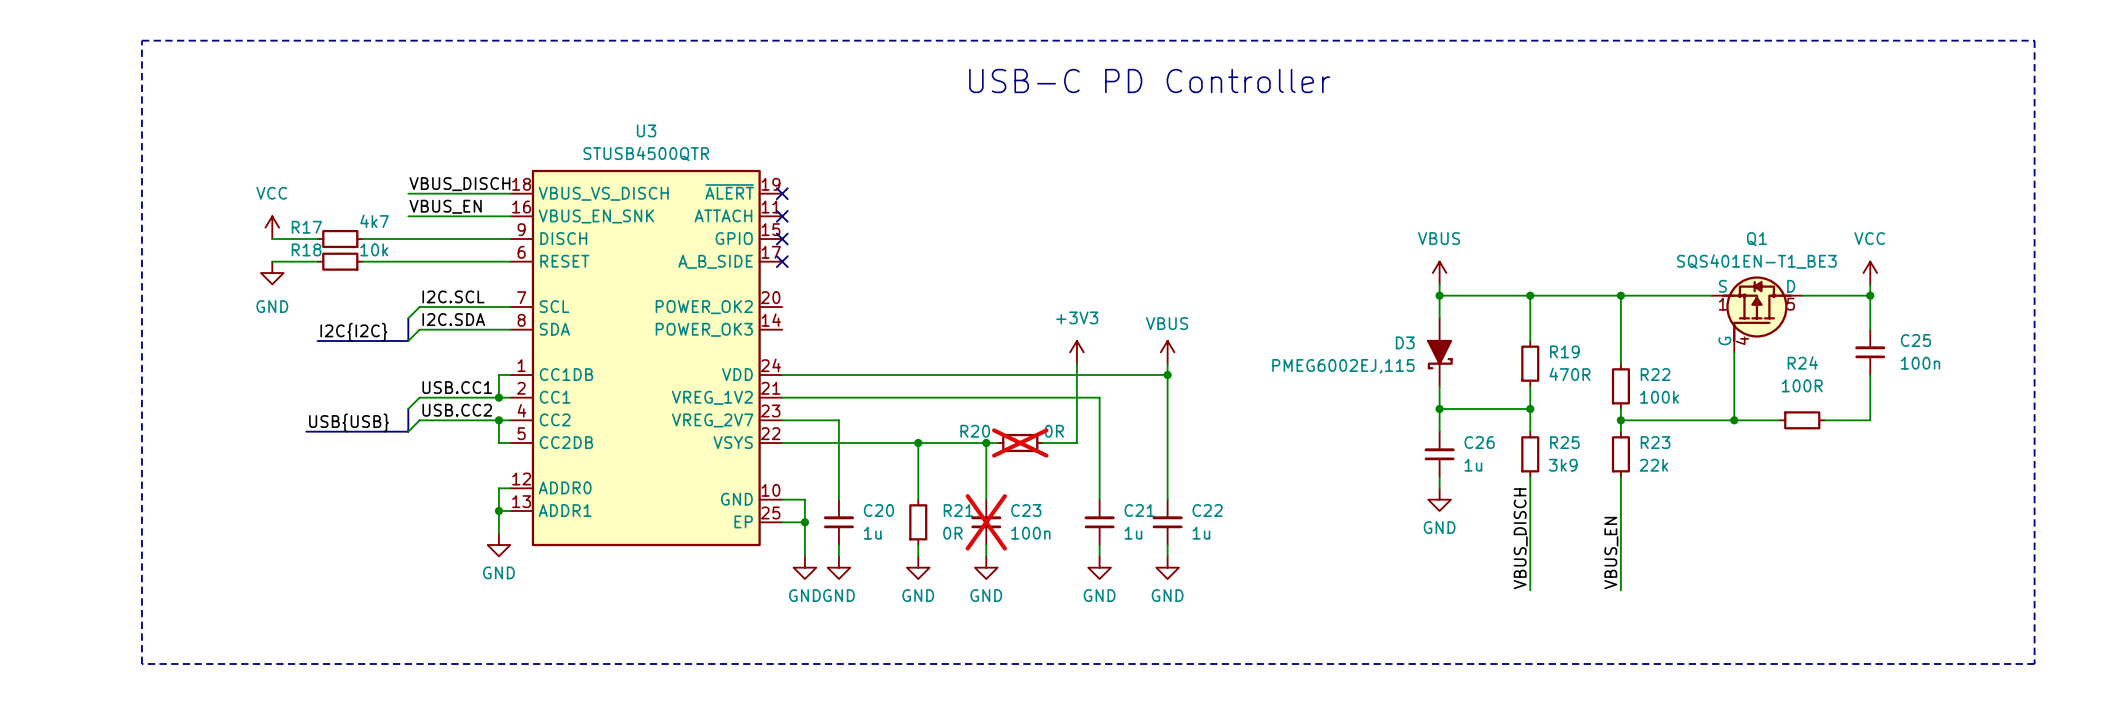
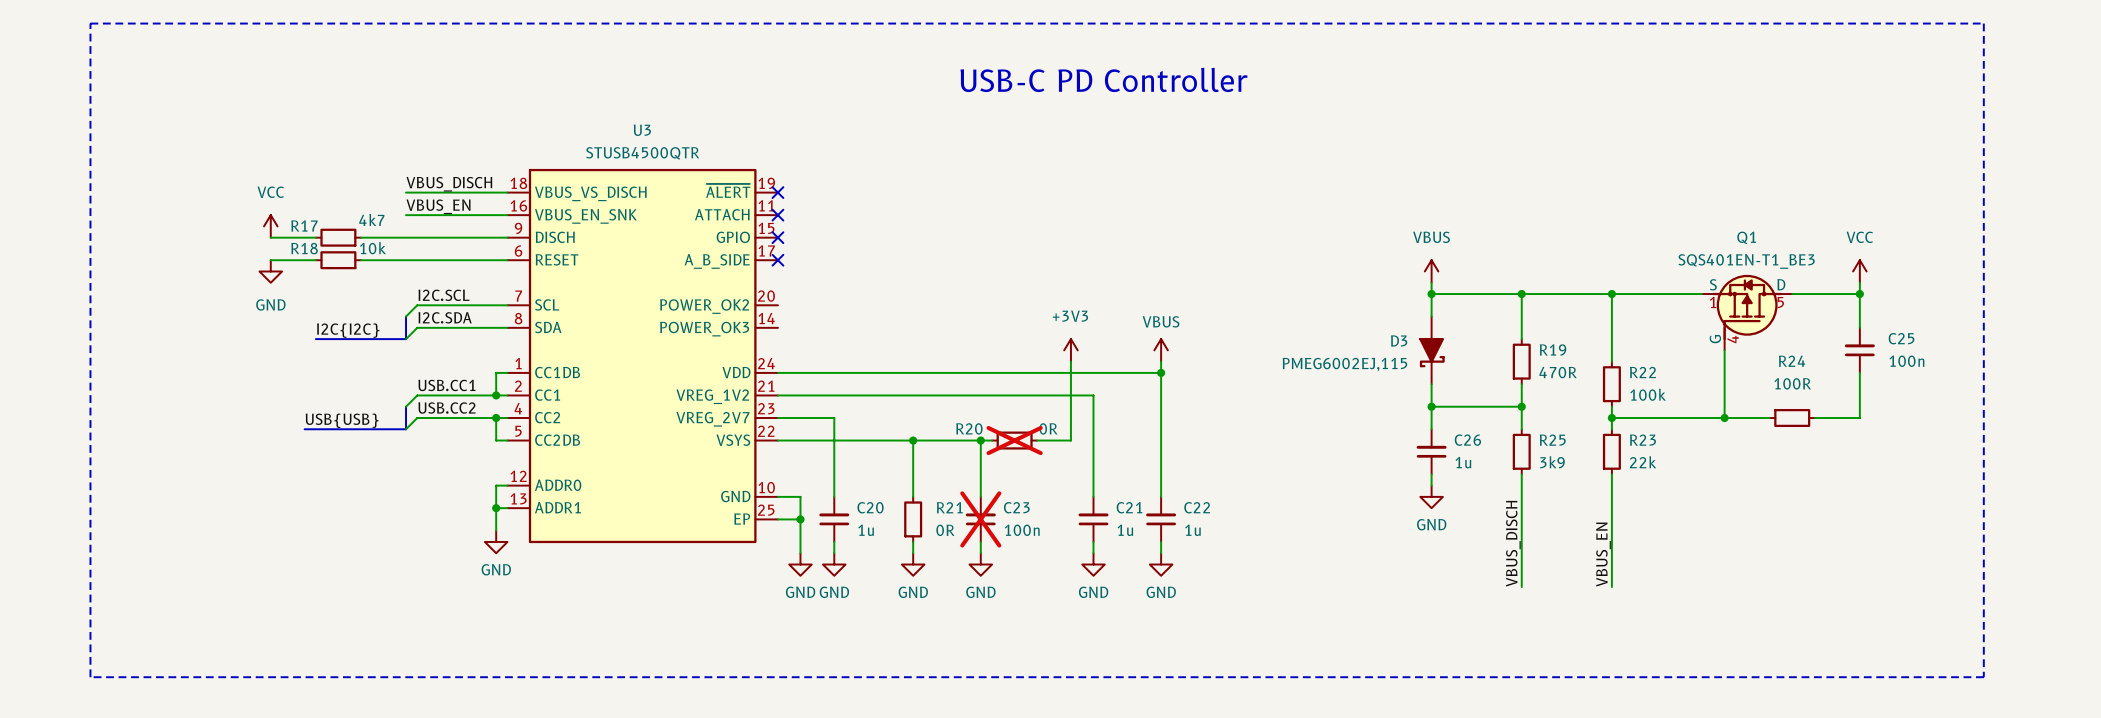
line: (141, 40) (2034, 40) (2034, 664) (141, 664) (141, 40) -> (90, 23) (90, 677) (1983, 677) (1983, 23) (90, 23)

